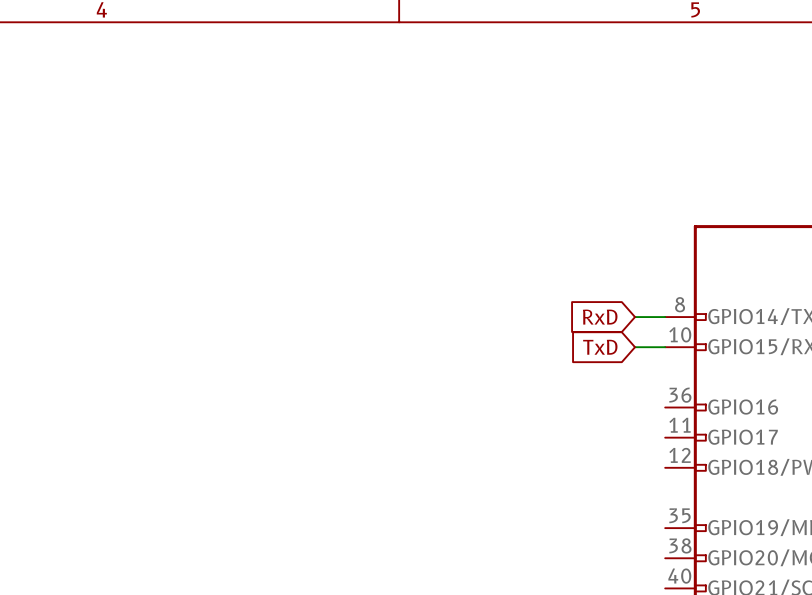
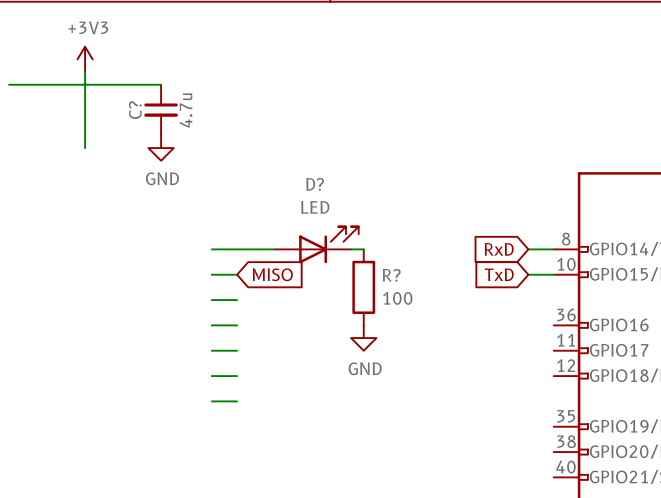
power symbol: none -> +3V3 (85, 59)
wire: none -> (85, 72) (85, 148)
wire: none -> (9, 84) (161, 84)
C?: none -> 4.7u (161, 110)
power symbol: none -> GND (161, 148)
D?: none -> LED (316, 244)
wire: none -> (211, 249) (275, 249)
wire: none -> (351, 249) (363, 249)
wire: none -> (211, 274) (237, 274)
global label: none -> MISO (272, 274)
R?: none -> 100 (363, 287)
wire: none -> (211, 300) (237, 300)
wire: none -> (211, 325) (237, 325)
power symbol: none -> GND (363, 338)
wire: none -> (211, 350) (237, 350)
wire: none -> (211, 376) (237, 376)
wire: none -> (211, 401) (237, 401)

